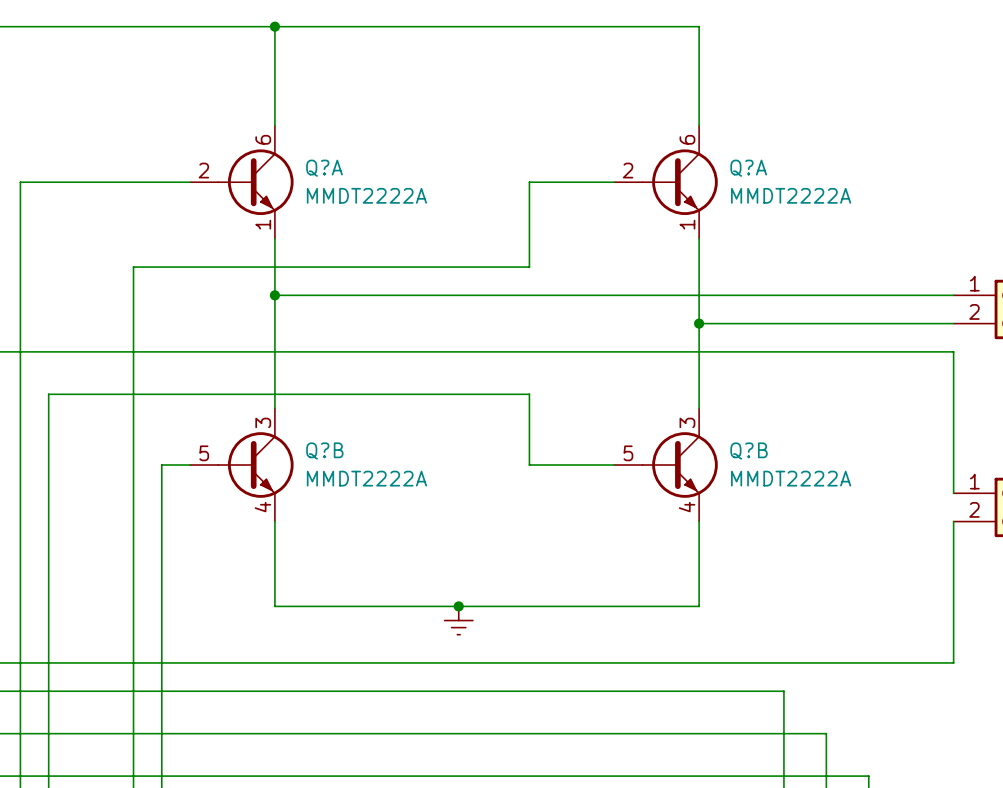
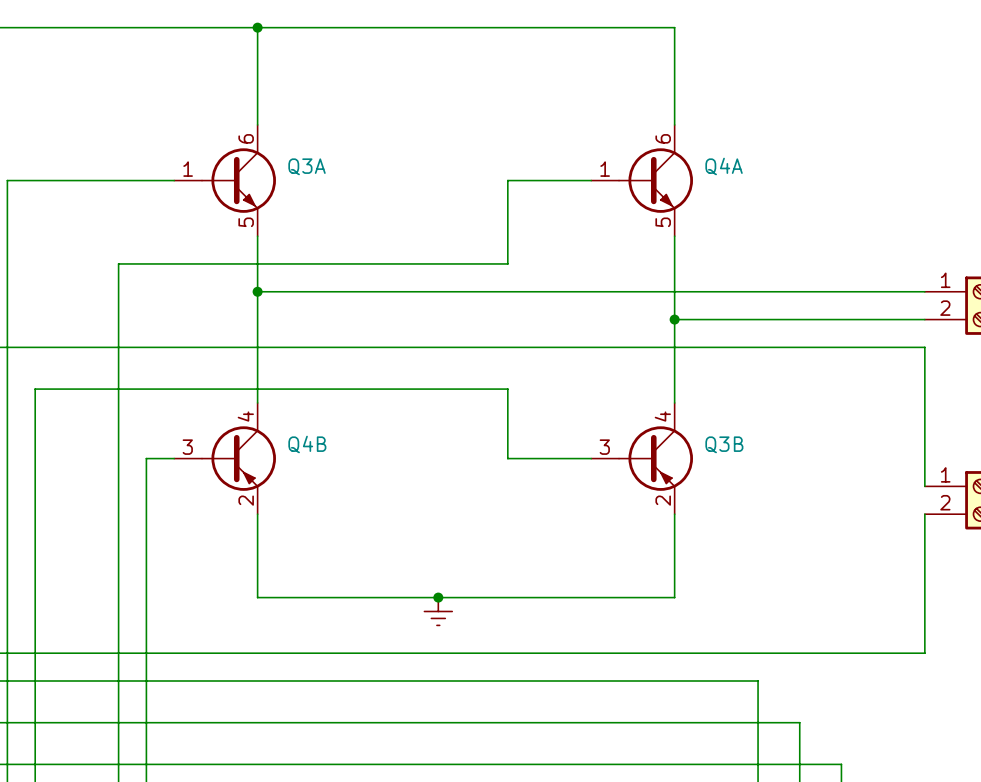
Q?A name: Q?A (324, 168) -> Q3A (307, 166)
Q?A name: Q?A (748, 168) -> Q4A (724, 166)
Q?A pin number: 2 (203, 170) -> 1 (188, 169)
Q?A pin number: 2 (628, 170) -> 1 (605, 169)
Q?A value: MMDT2222A (366, 195) -> none
Q?A value: MMDT2222A (791, 195) -> none
Q?A pin number: 1 (263, 224) -> 5 (246, 222)
Q?A pin number: 1 (687, 224) -> 5 (663, 222)
Q?B: MMDT2222A (241, 465) -> none
Q4B: none -> (225, 458)
Q?B: MMDT2222A (666, 465) -> none
Q3B: none -> (642, 458)

